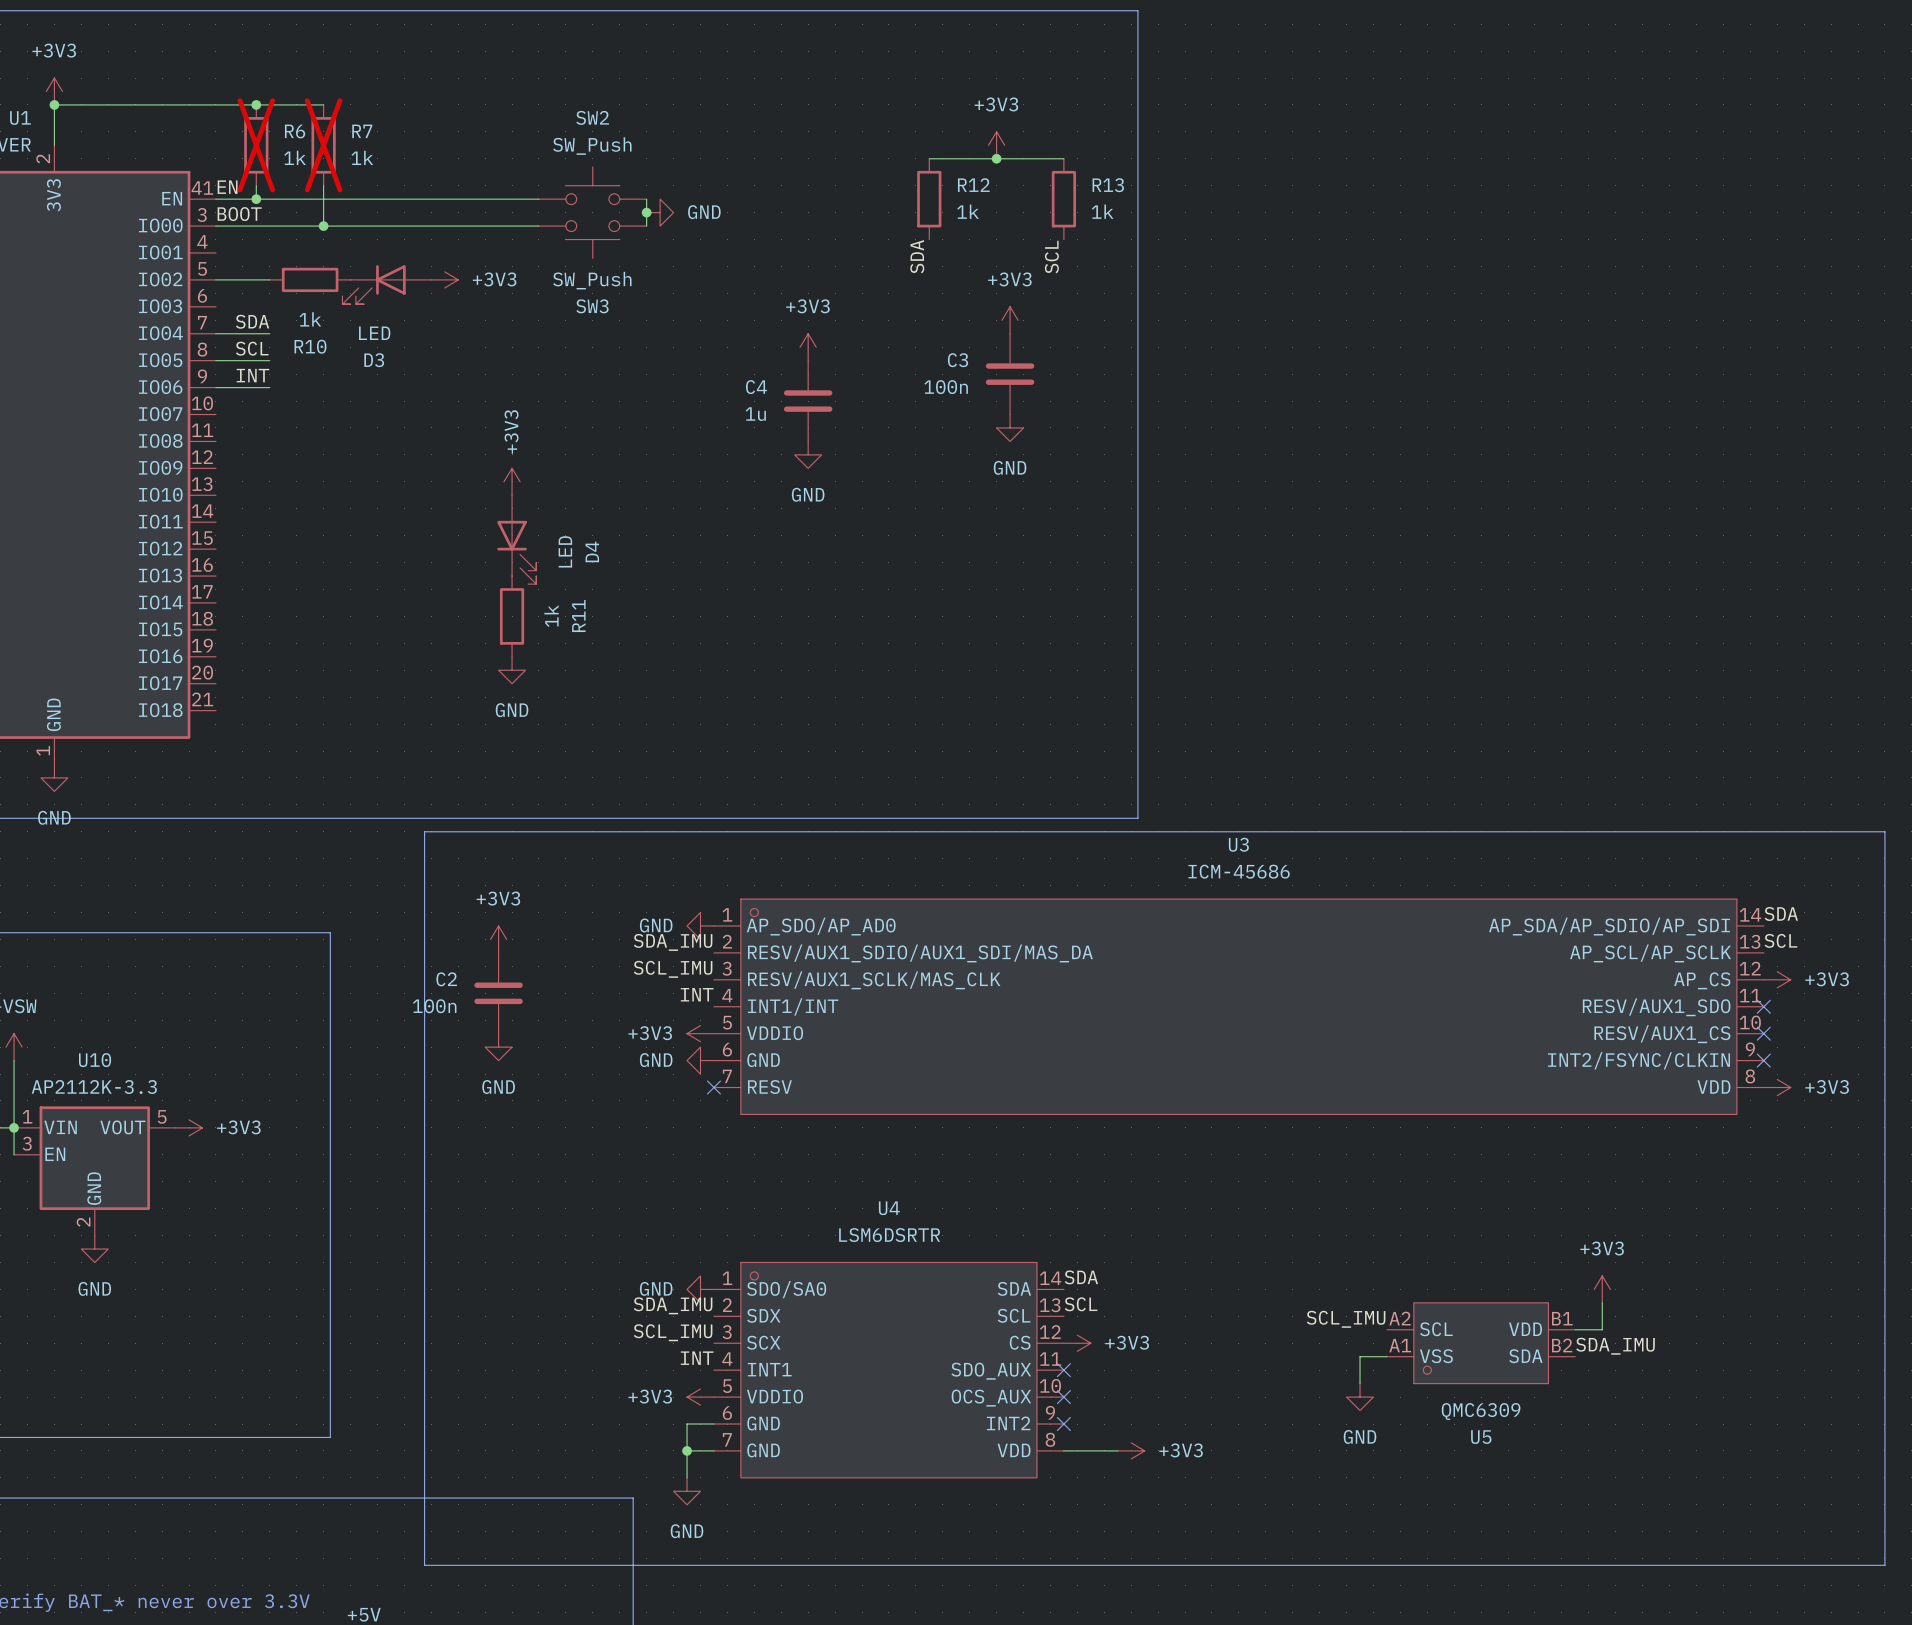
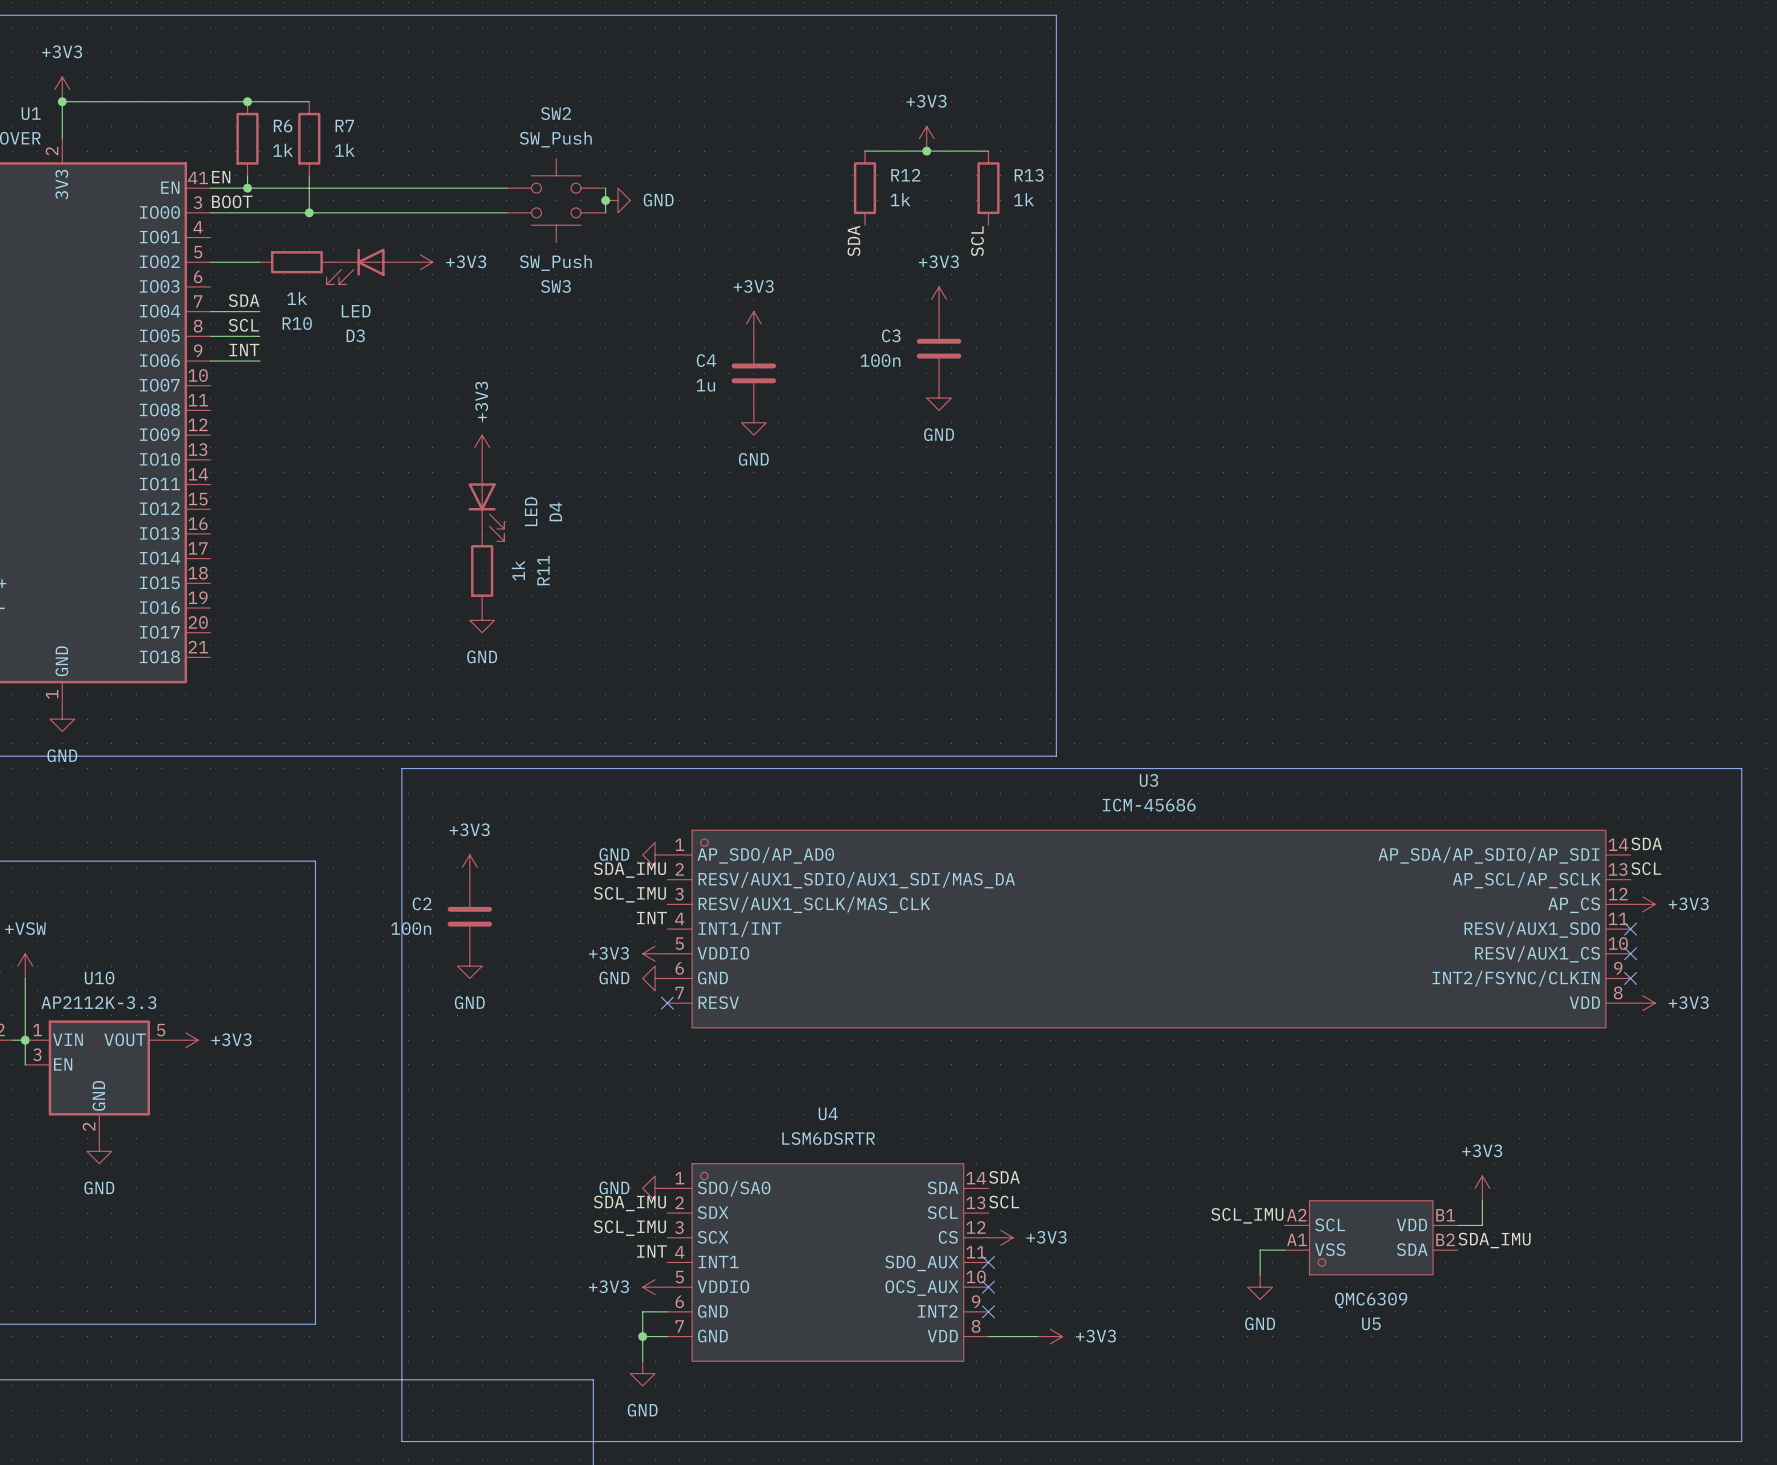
R6 do-not-place cross: (256, 145) -> none
R7 do-not-place cross: (323, 145) -> none

